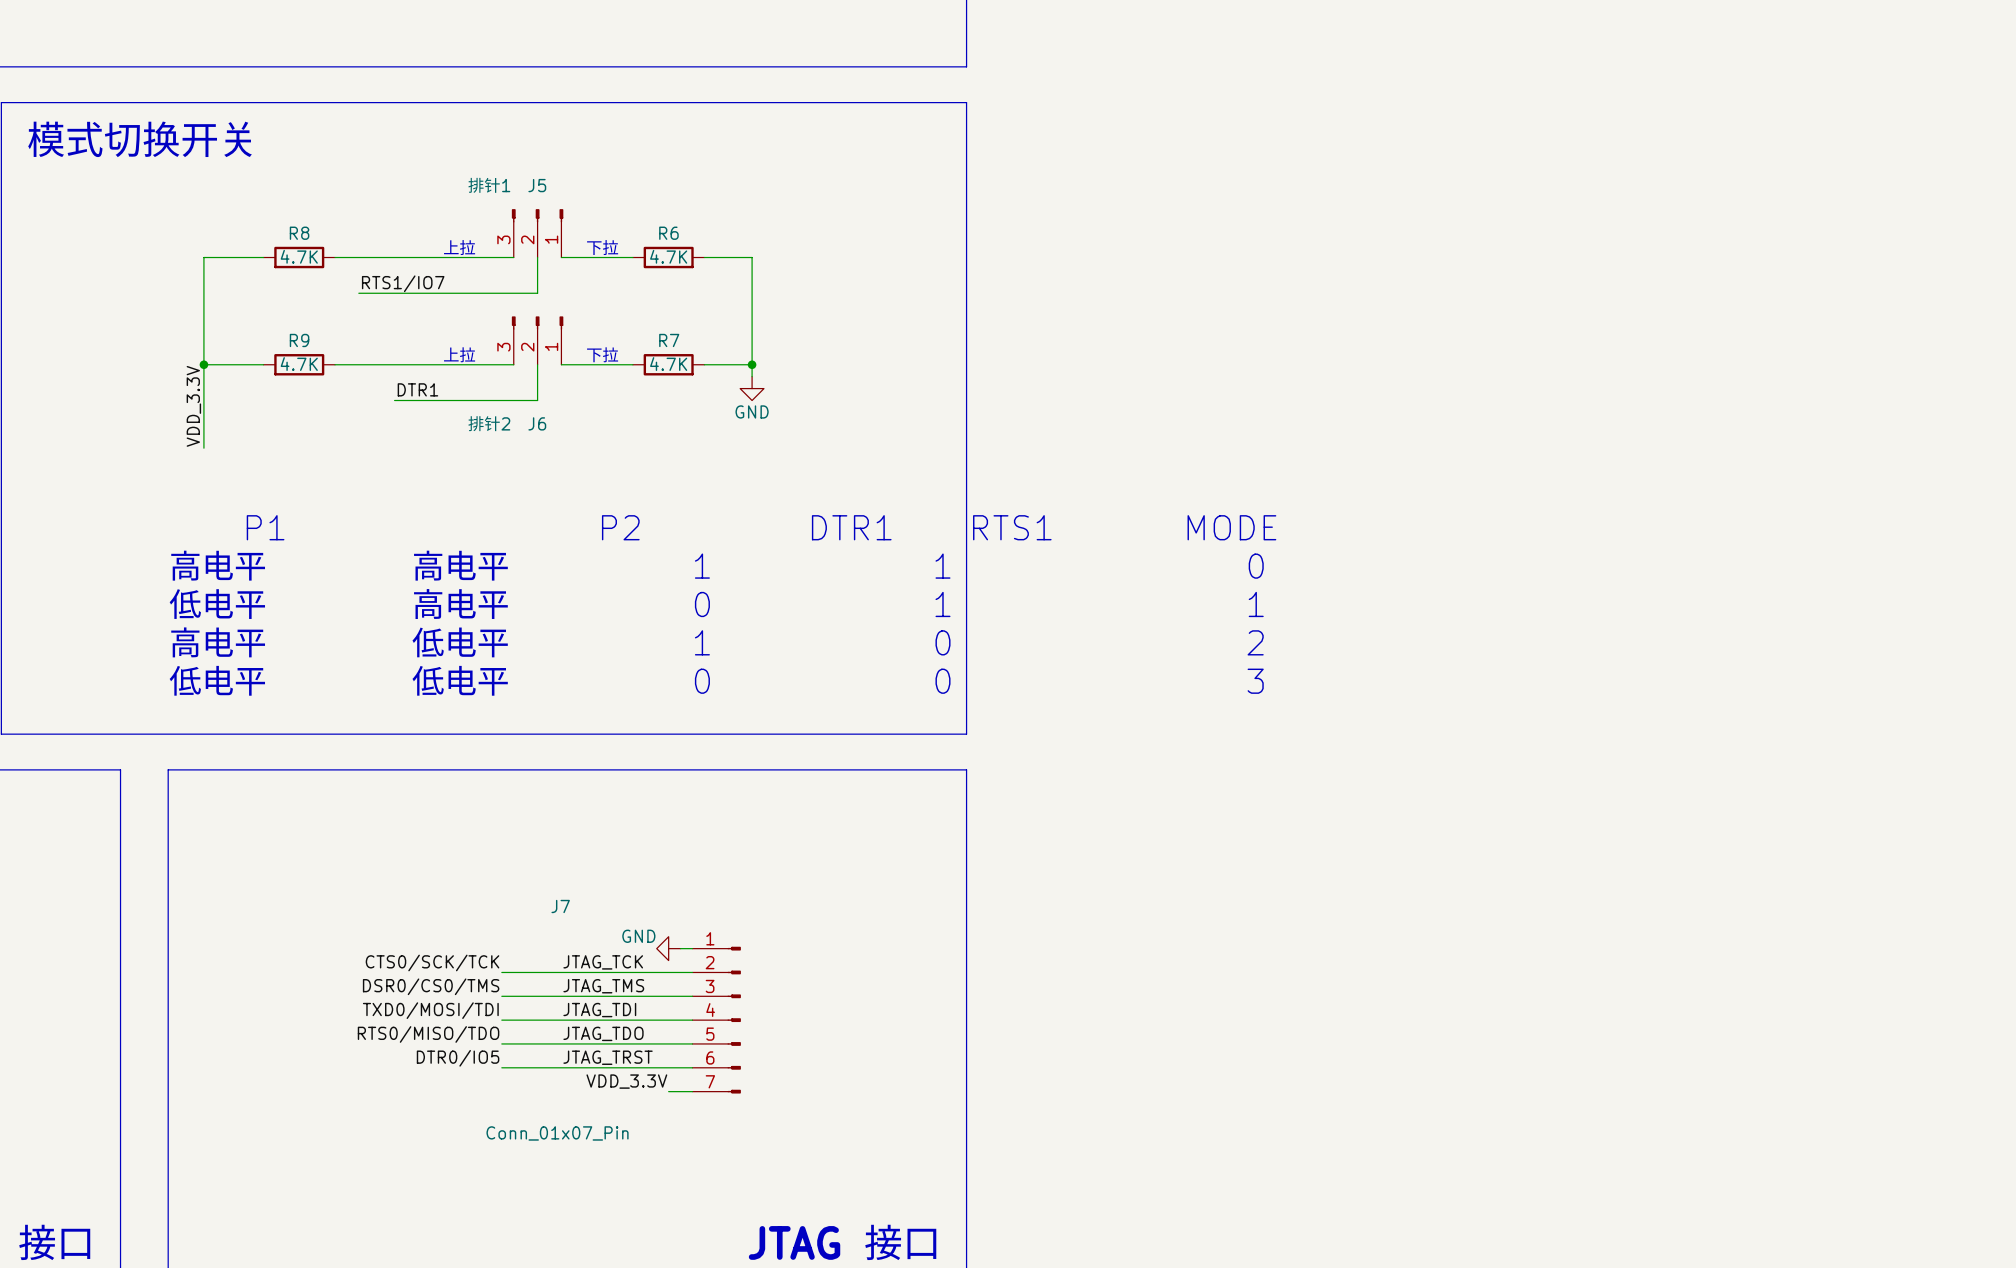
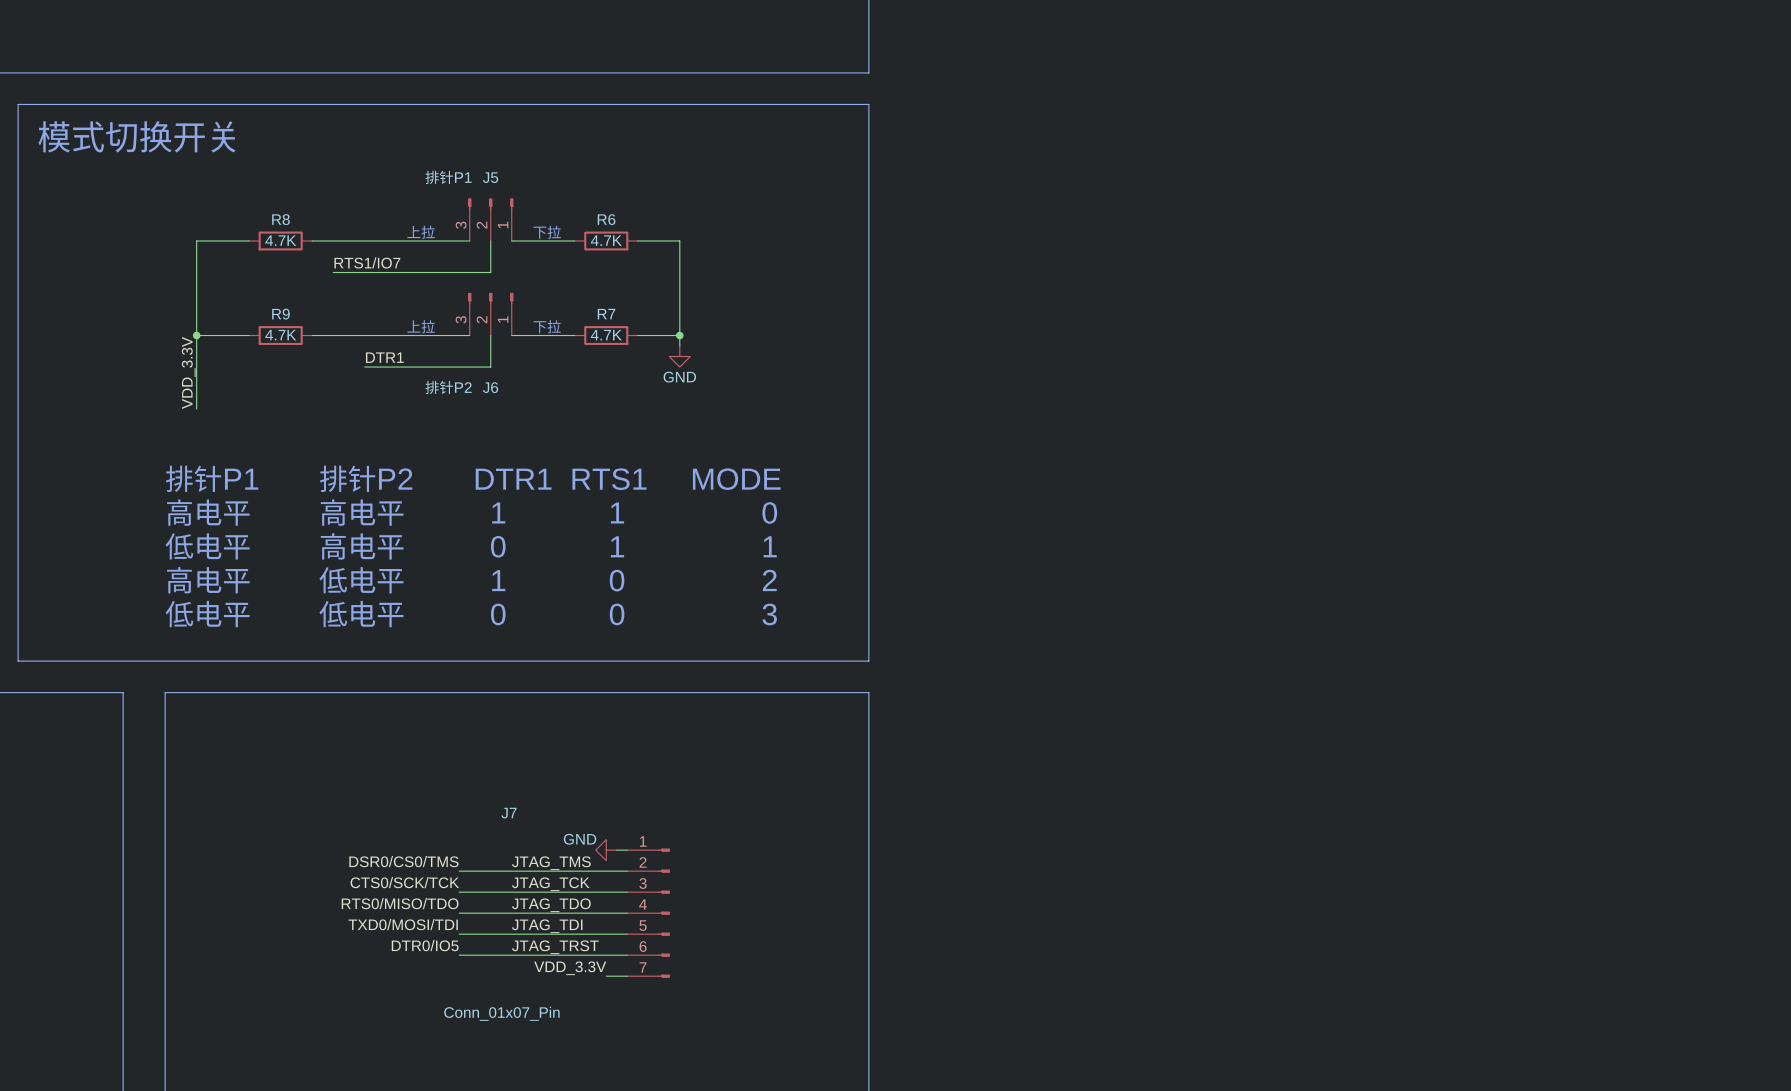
J5 value: 排针1 (489, 185) -> 排针P1 (448, 177)
J6 value: 排针2 (489, 423) -> 排针P2 (448, 387)
text: P1 P2 DTR1 RTS1 MODE (761, 527) -> 排针P1 排针P2 DTR1 RTS1 MODE (473, 478)
label: CTS0/SCK/TCK (432, 962) -> DSR0/CS0/TMS (403, 861)
label: JTAG_TCK (603, 962) -> JTAG_TMS (551, 863)
label: DSR0/CS0/TMS (431, 986) -> CTS0/SCK/TCK (404, 882)
label: JTAG_TMS (603, 986) -> JTAG_TCK (550, 884)
label: TXD0/MOSI/TDI (430, 1010) -> RTS0/MISO/TDO (400, 903)
label: JTAG_TDI (599, 1010) -> JTAG_TDO (551, 905)
label: JTAG_TDO (603, 1033) -> JTAG_TDI (547, 926)
label: RTS0/MISO/TDO (428, 1034) -> TXD0/MOSI/TDI (403, 924)

